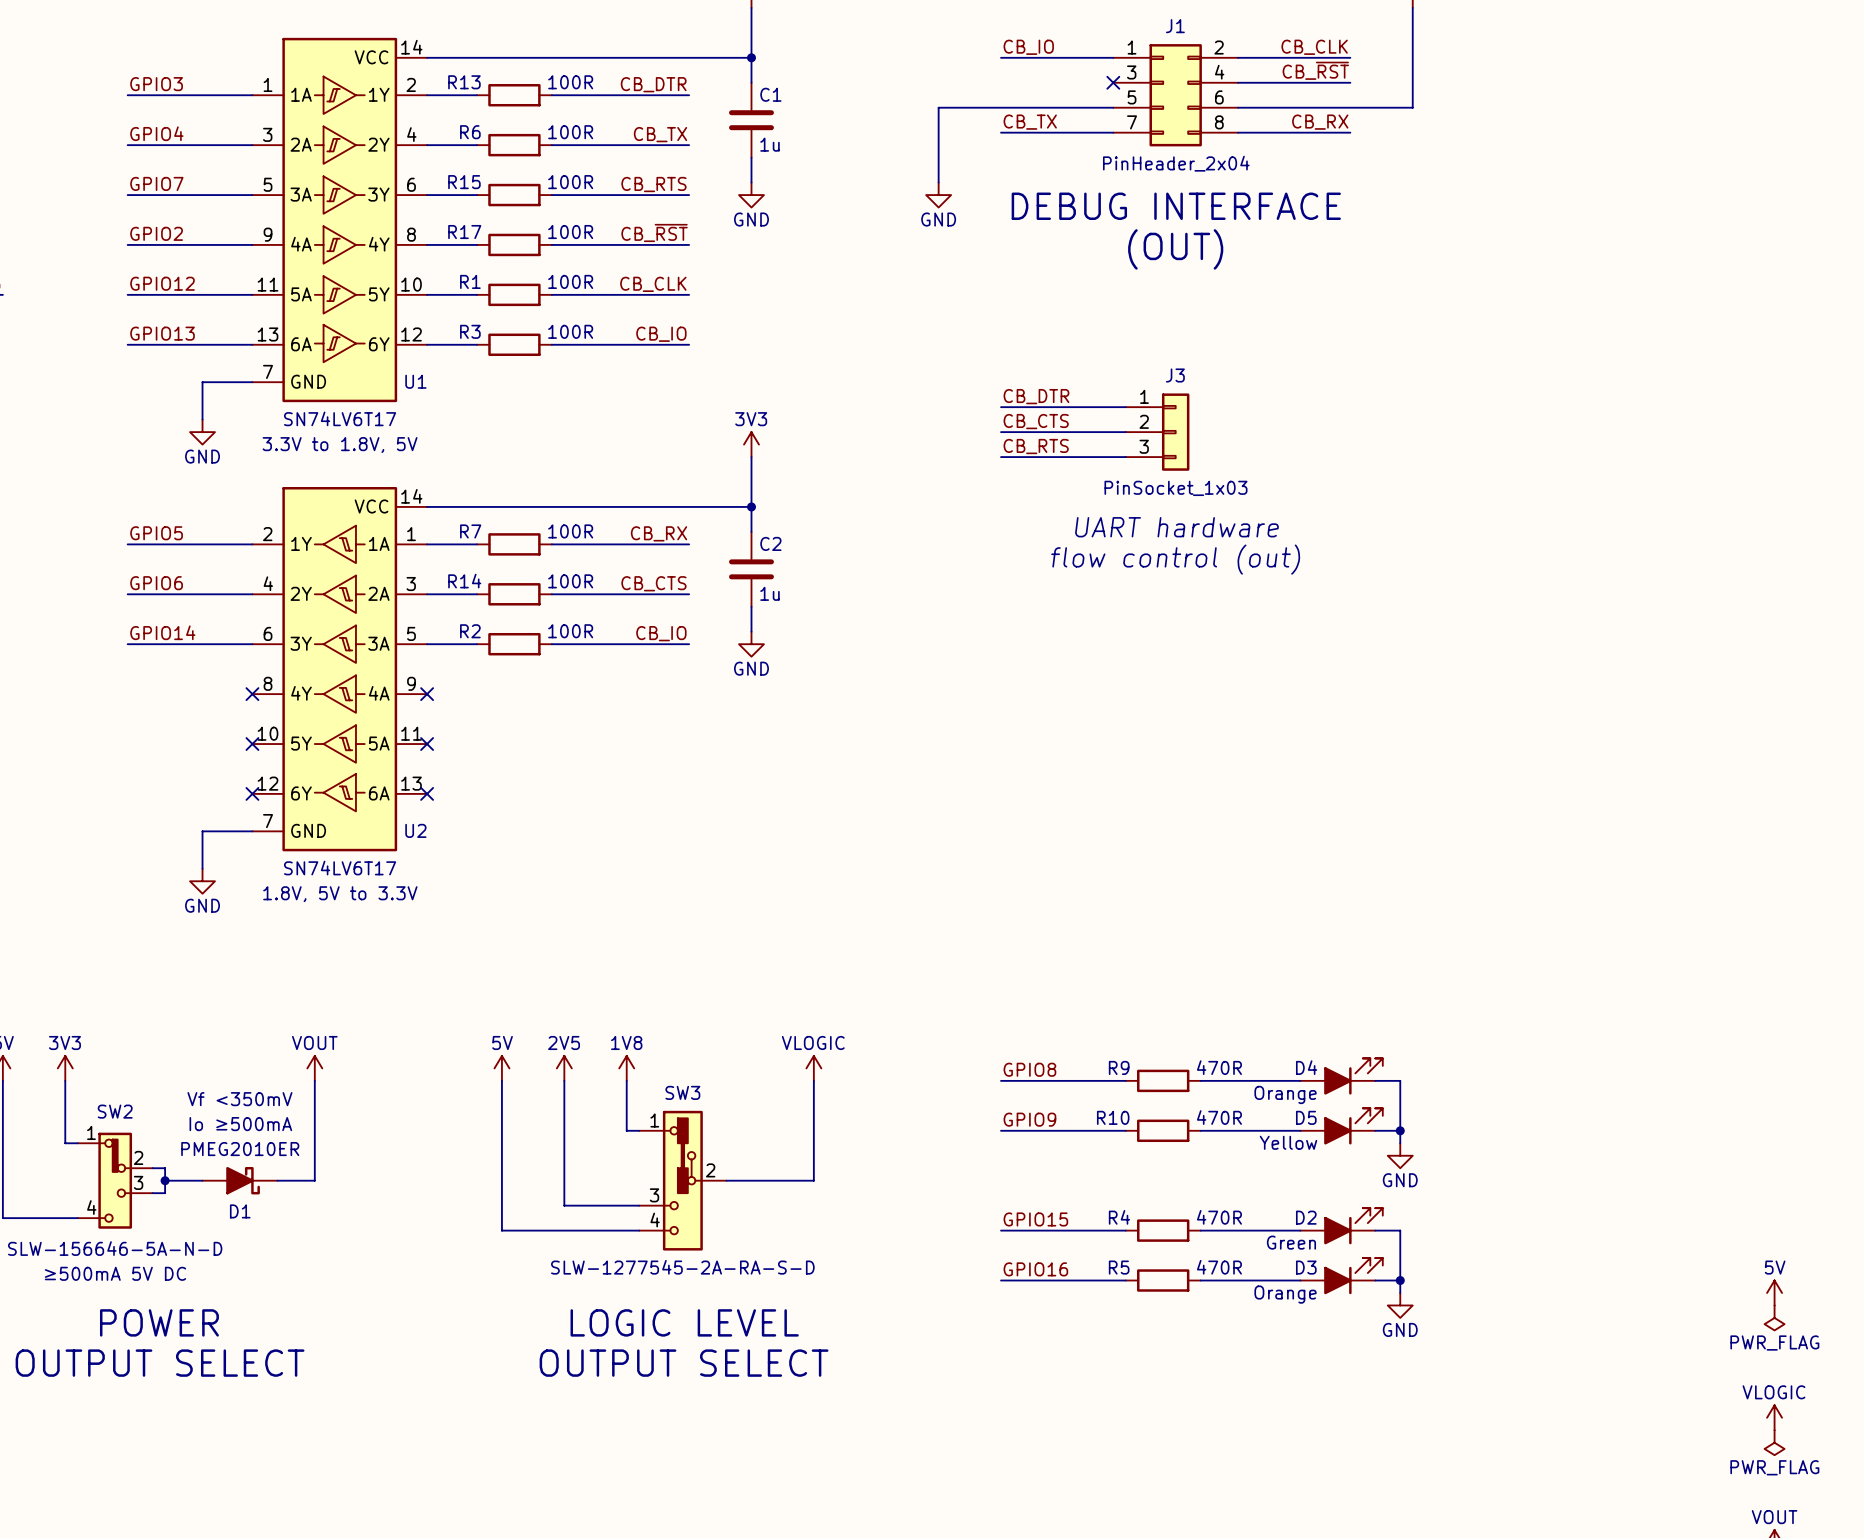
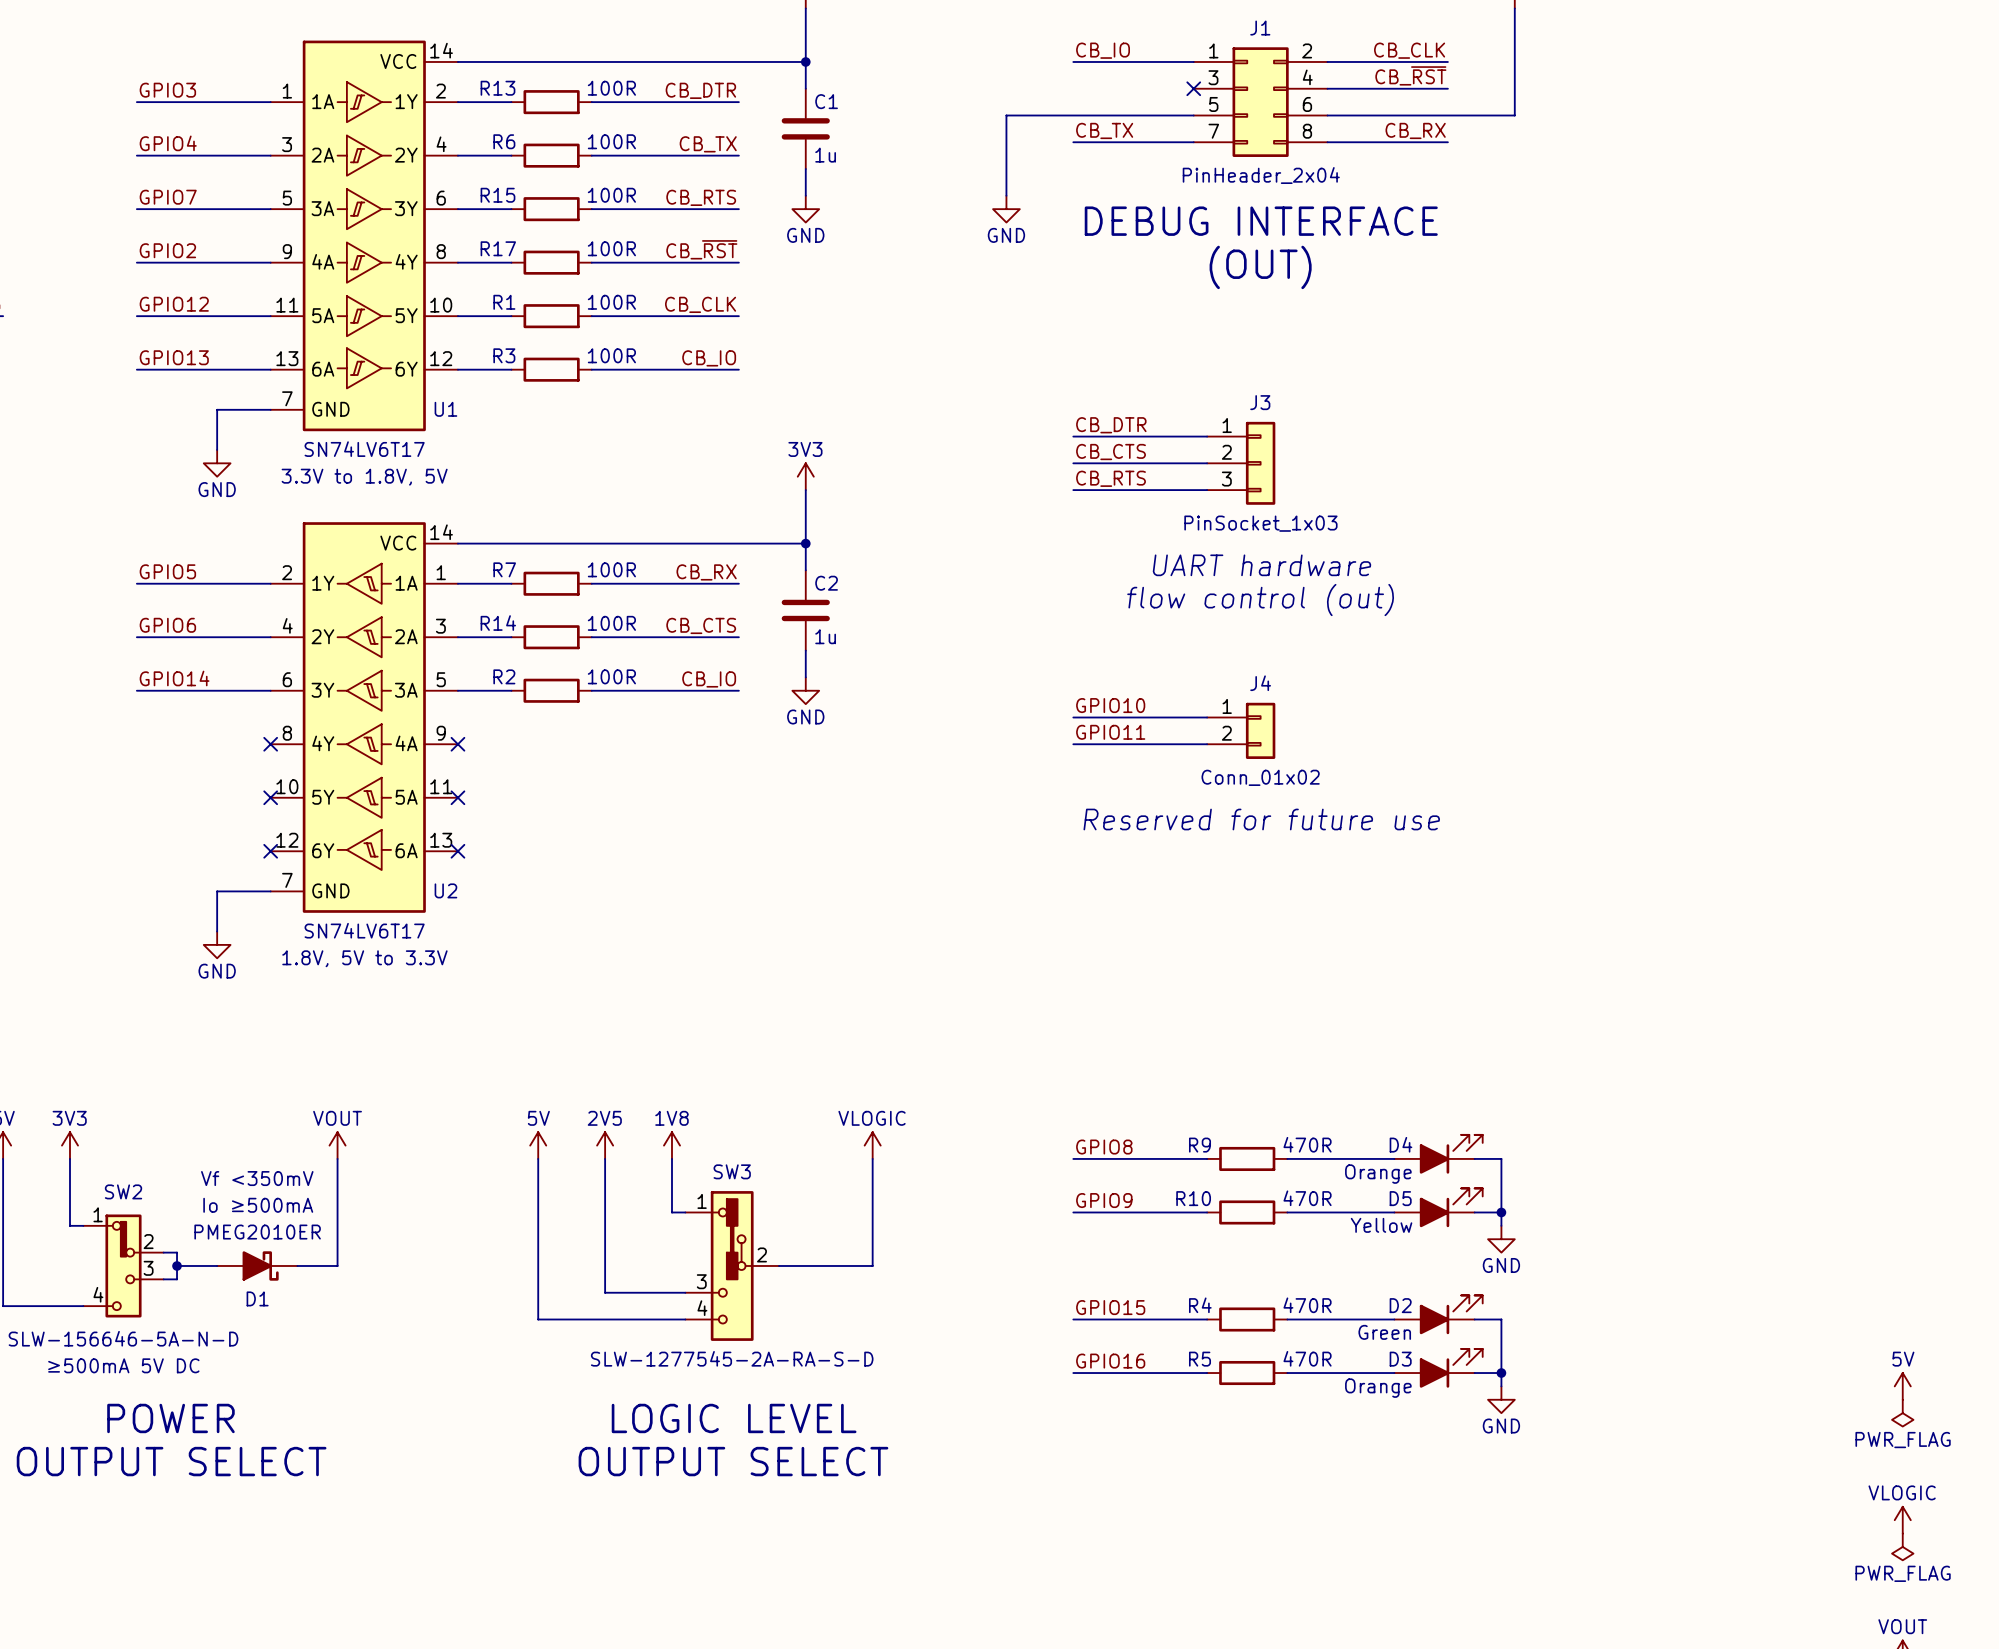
label: none -> GPIO10 (1110, 705)
wire: none -> (1073, 717) (1207, 717)
J4: none -> Conn_01x02 (1241, 730)
label: none -> GPIO11 (1110, 732)
wire: none -> (1073, 744) (1207, 744)
text: none -> Reserved for future use (1261, 819)

